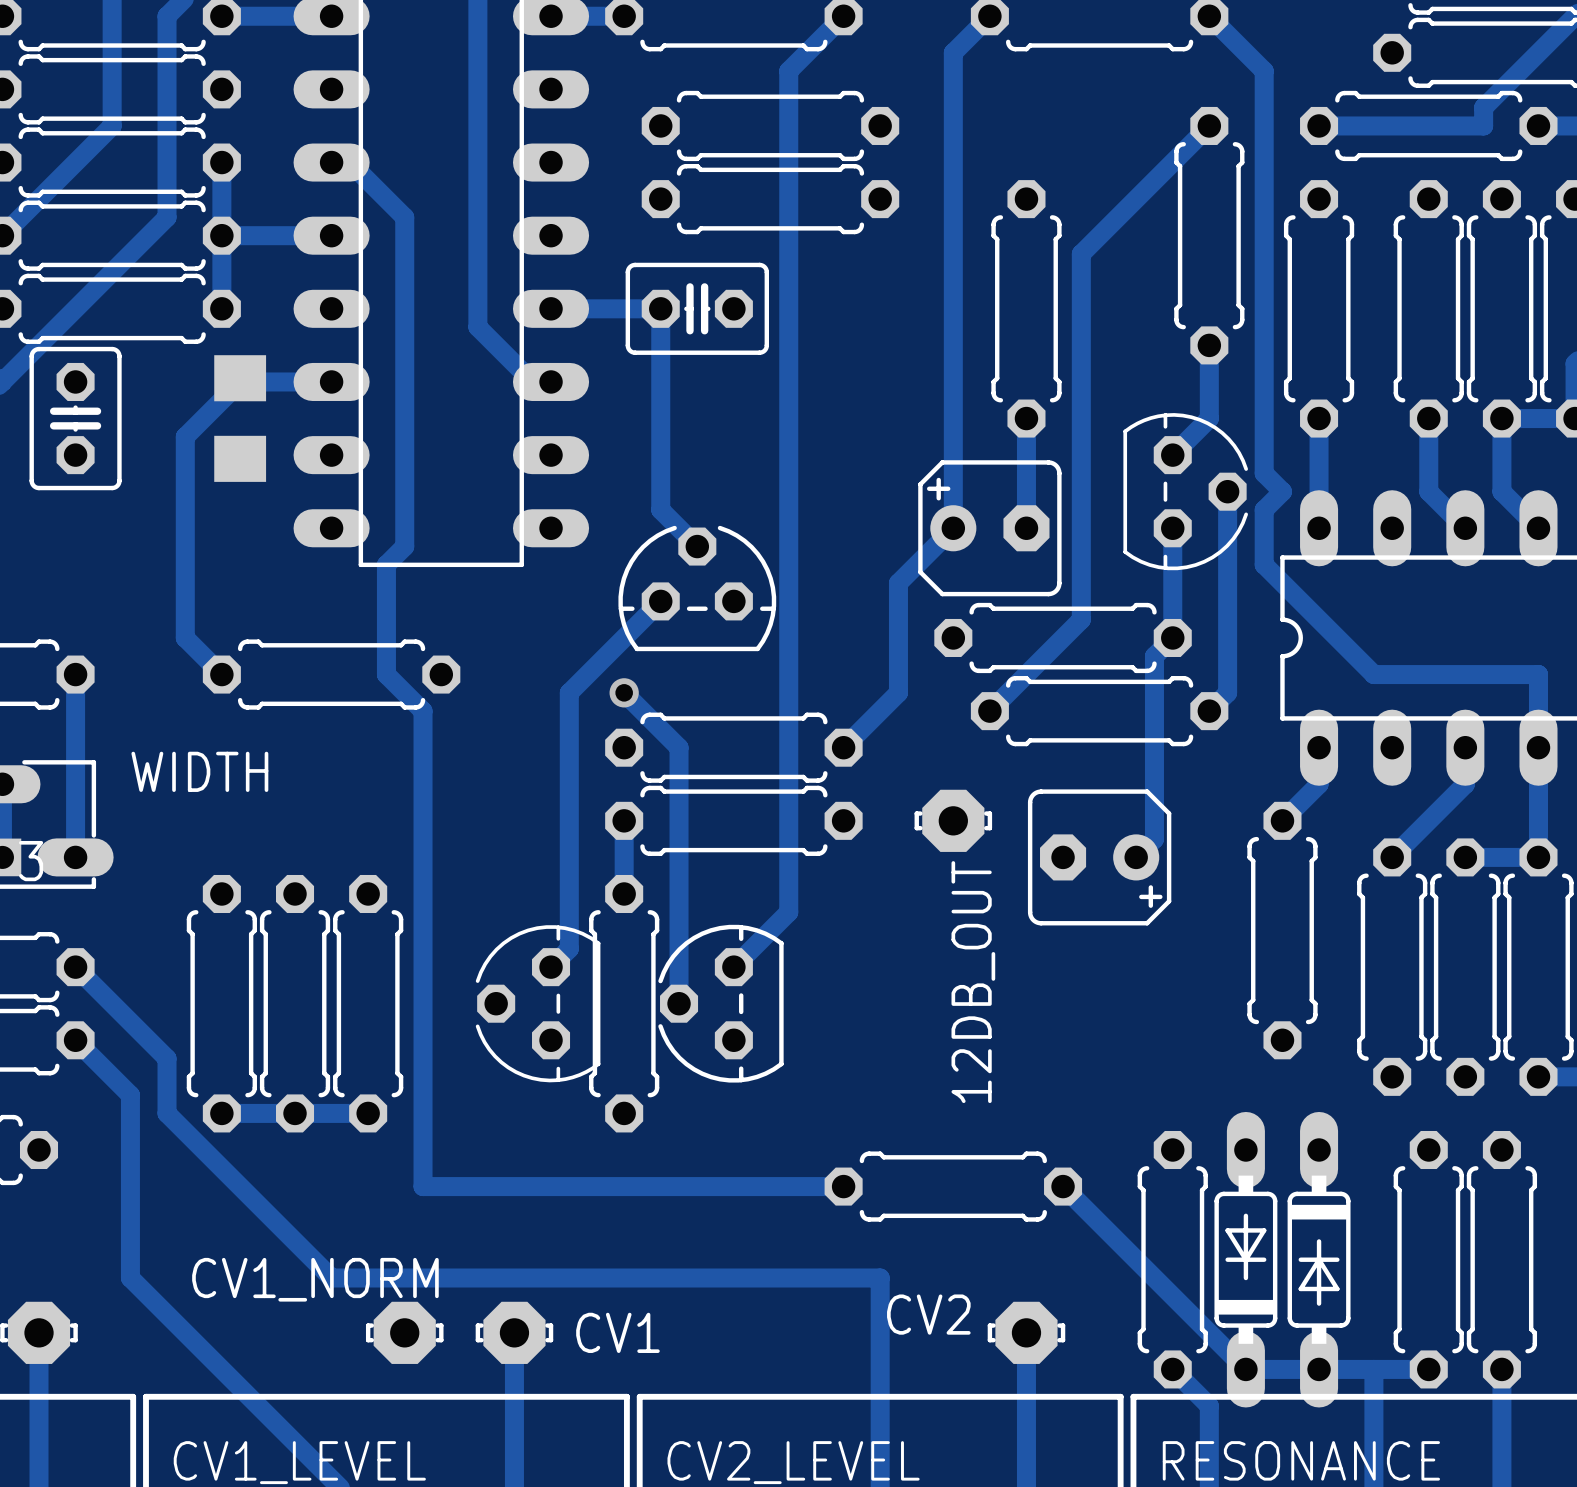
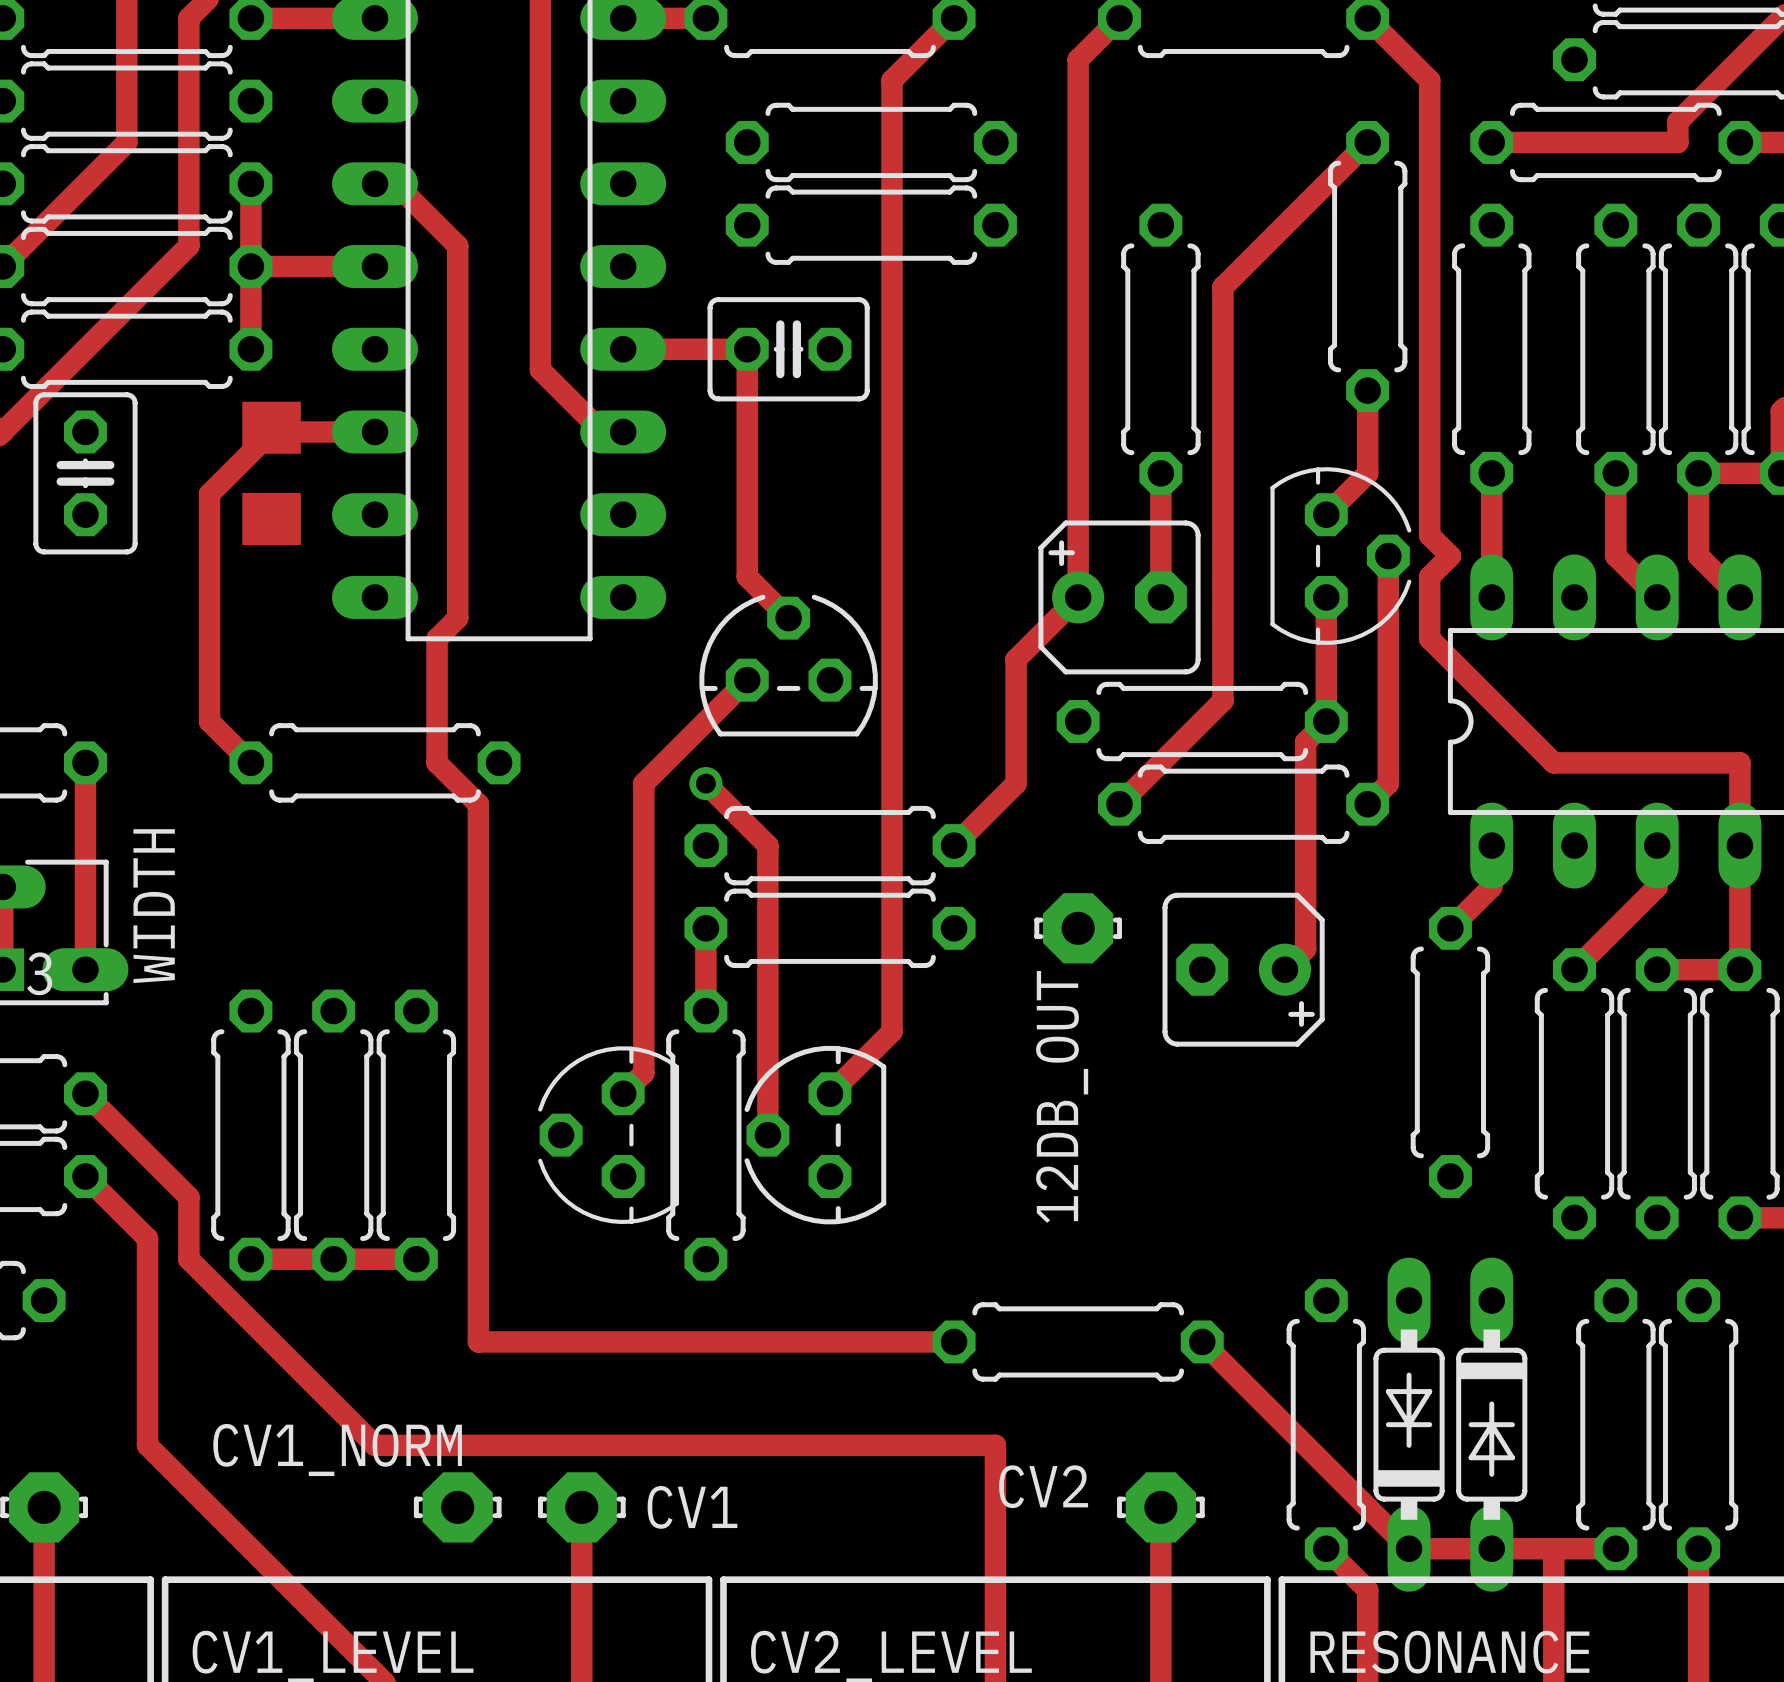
WIDTH name rotation: 0° (199, 771) -> 90° counterclockwise (154, 906)
12DB_OUT name position: 12DB_OUT (973, 982) -> 12DB_OUT (1062, 1096)

